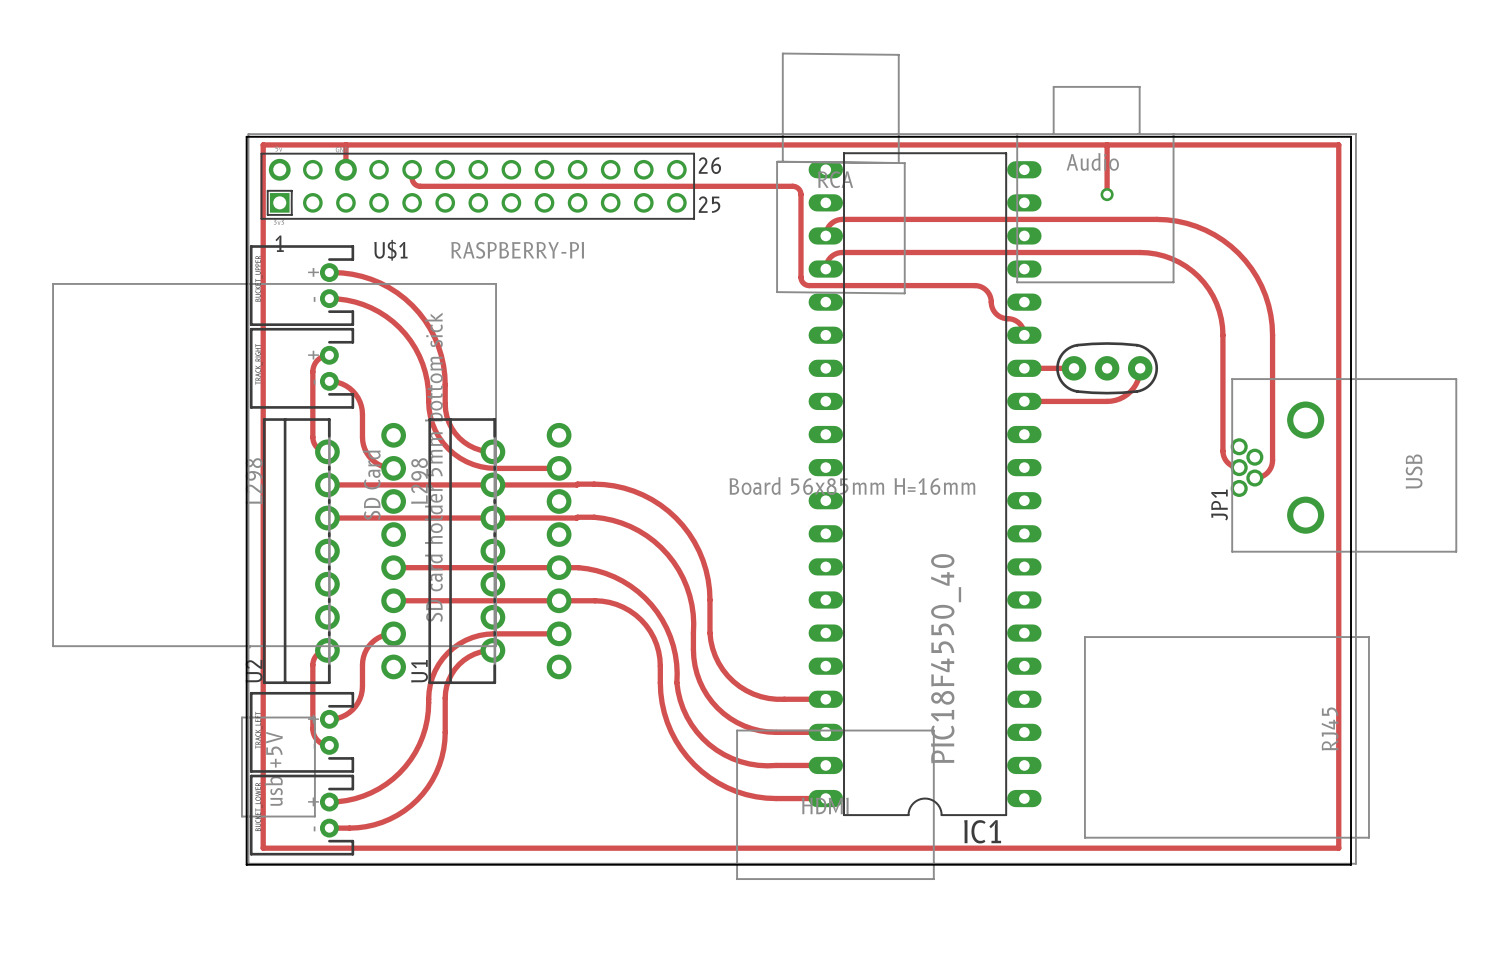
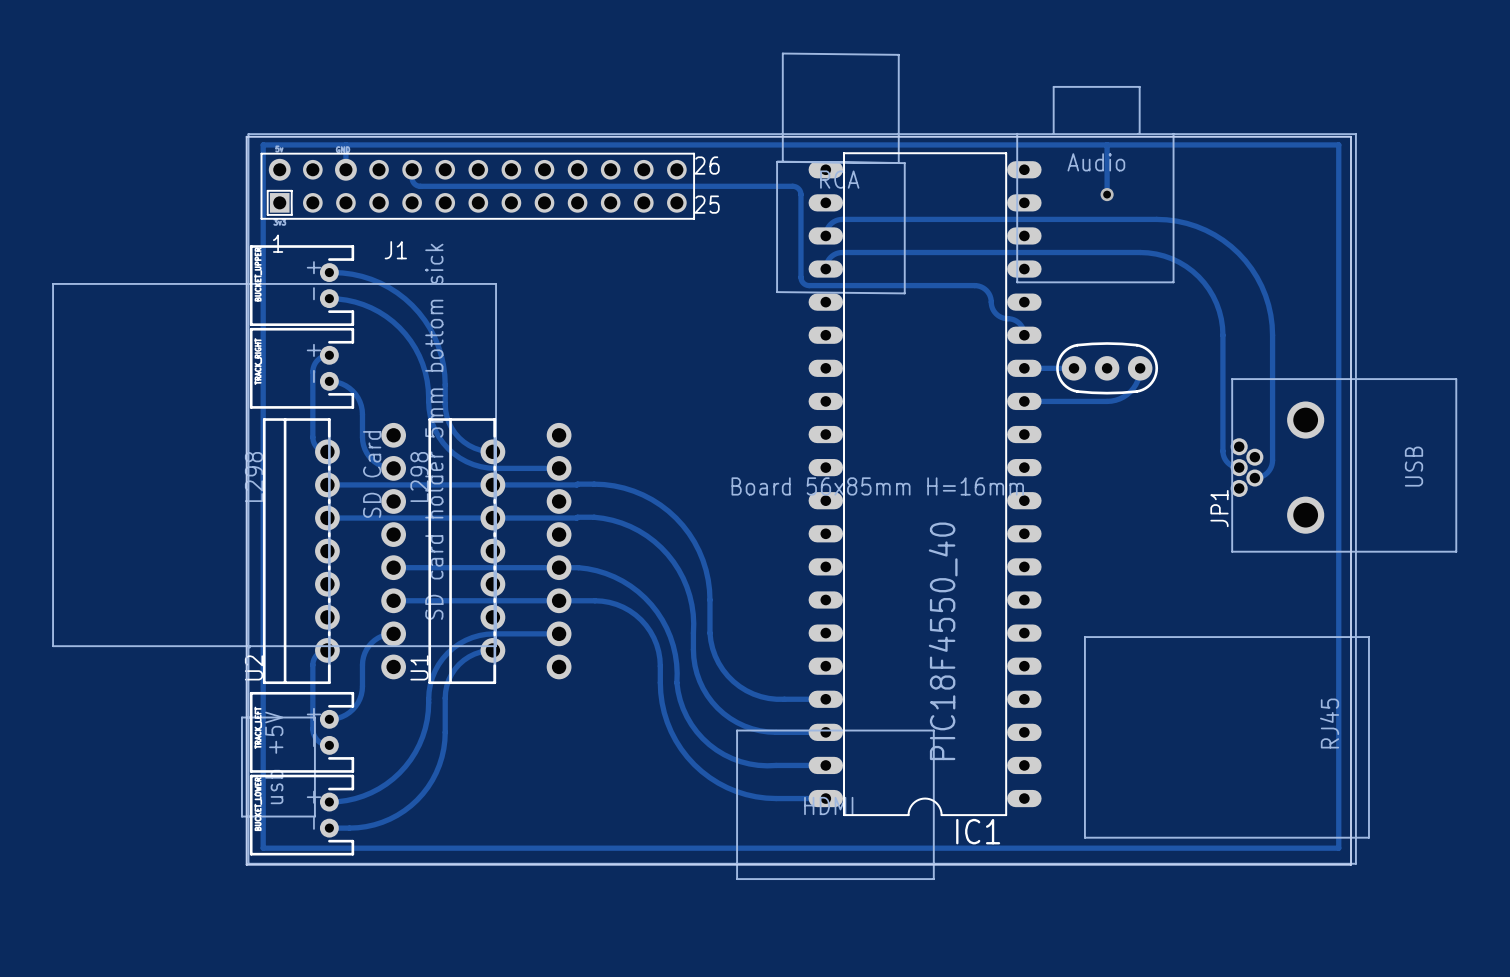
U$1 name: U$1 (390, 250) -> J1 (395, 250)
U$1 value: RASPBERRY-PI (517, 250) -> none

